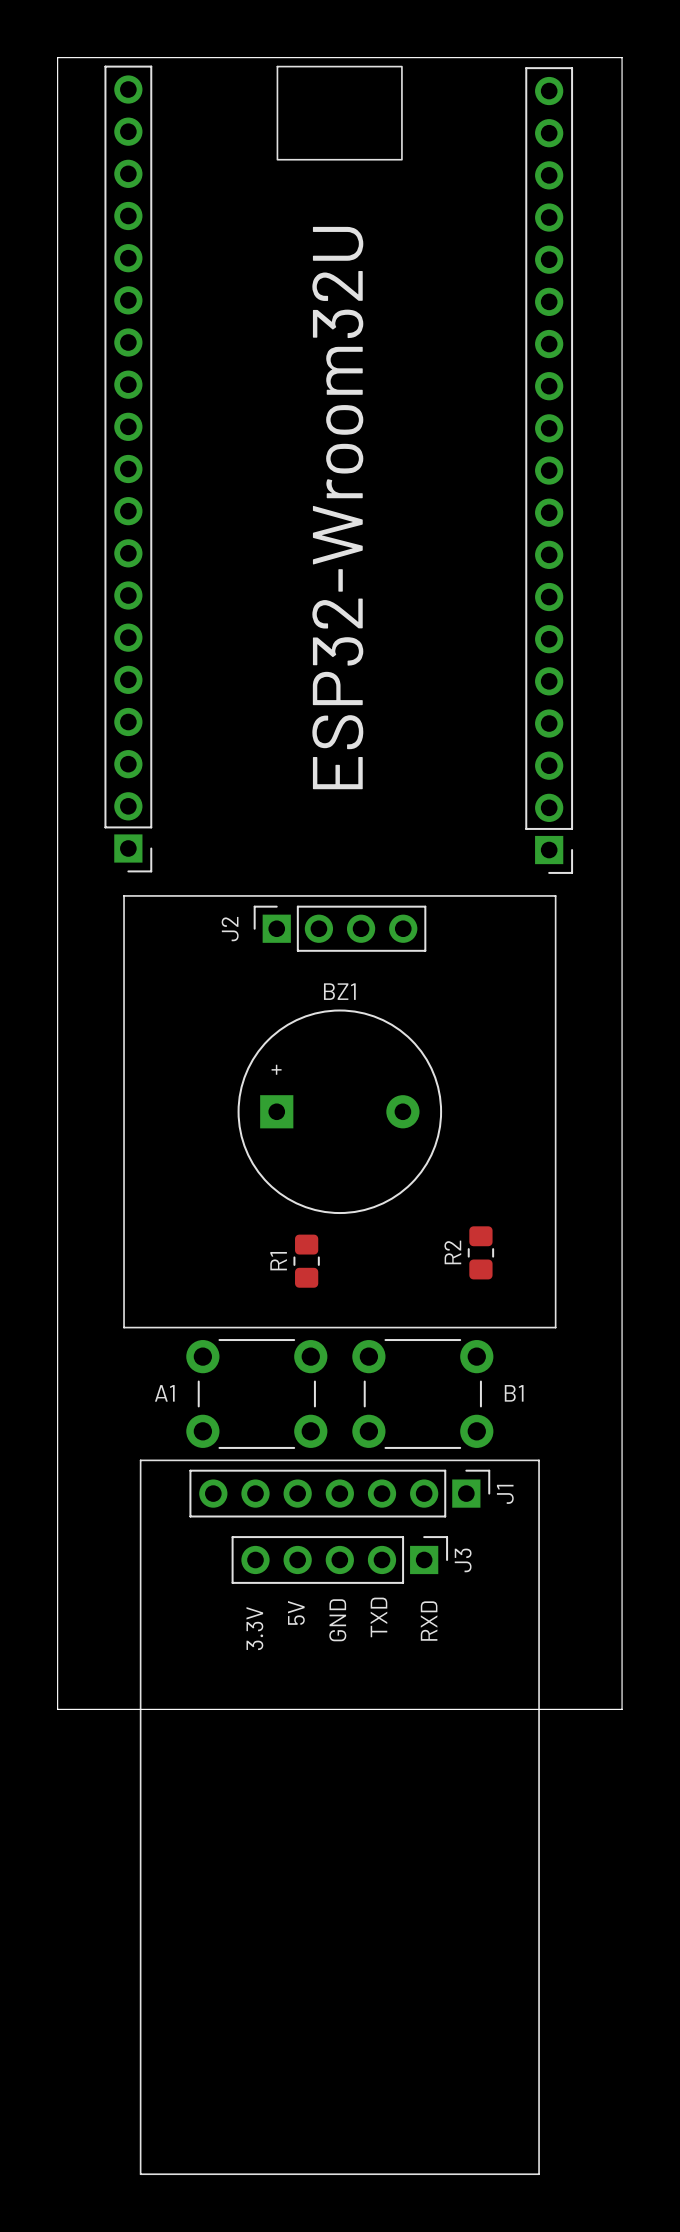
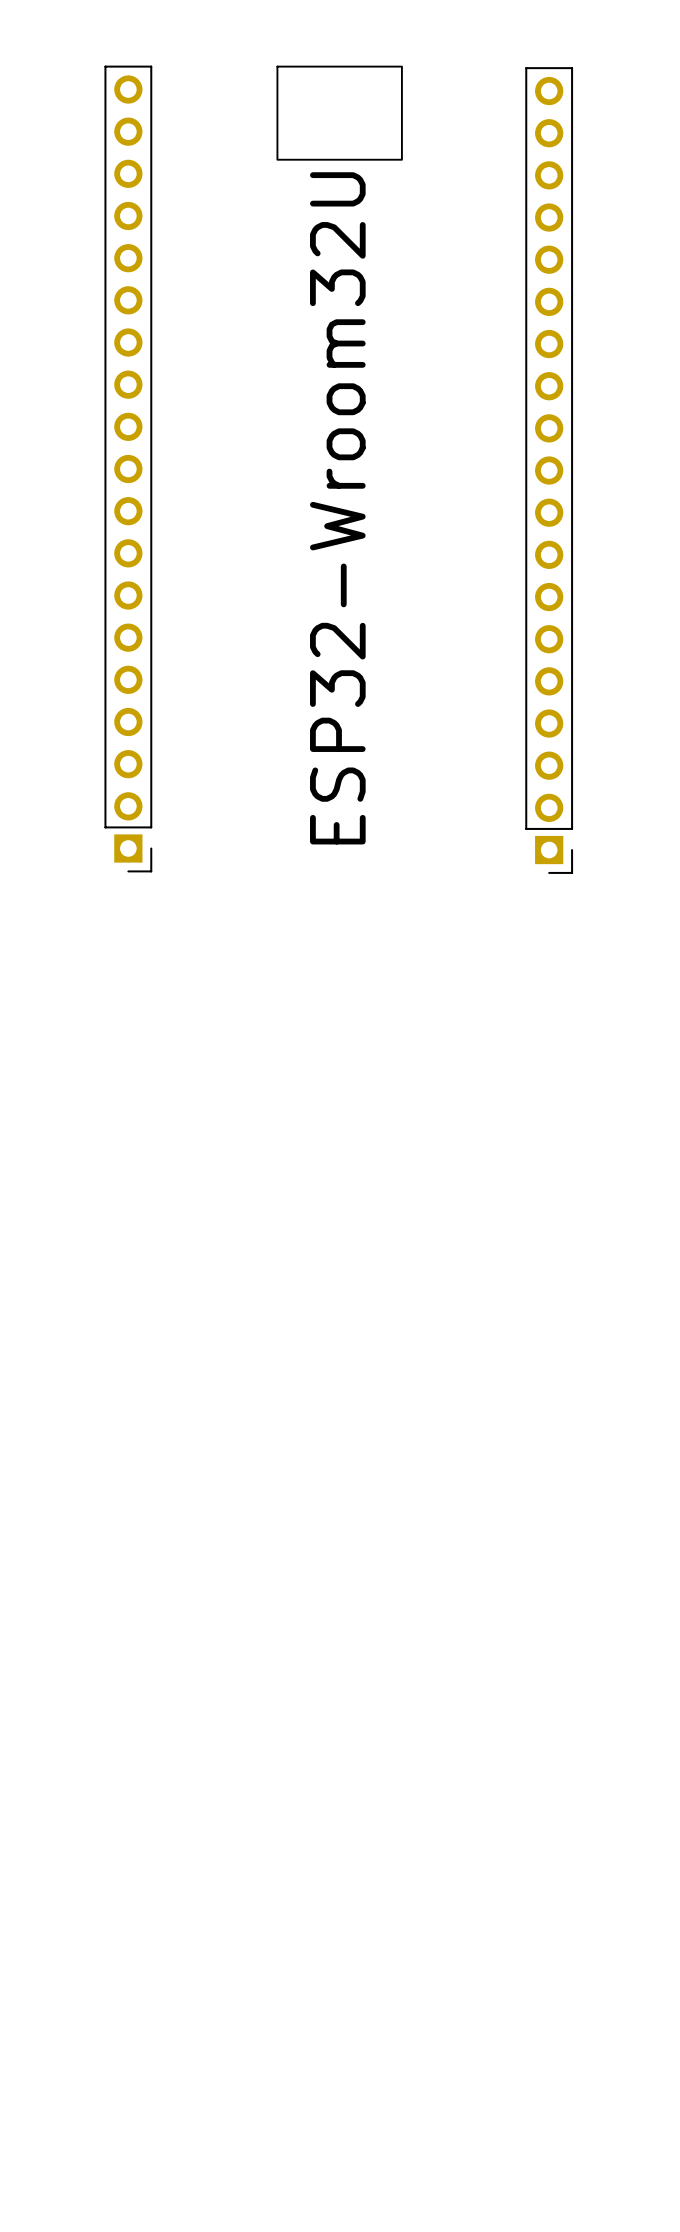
board edge: (57, 57) (622, 57) (622, 1709) (57, 1709) (57, 57) -> none
line: (124, 895) (555, 895) (555, 1327) (124, 1327) (124, 895) -> none
J2: (340, 928) -> none
BZ1: (339, 1111) -> none
R2: (480, 1252) -> none
R1: (306, 1261) -> none
A1: (256, 1393) -> none
B1: (422, 1393) -> none
line: (140, 1460) (539, 1460) (539, 2174) (140, 2174) (140, 1460) -> none
J1: (339, 1493) -> none
J3: (339, 1559) -> none
text: 5V (296, 1612) -> none
text: TXD (378, 1617) -> none
text: GND (337, 1620) -> none
text: RXD (429, 1621) -> none
text: 3.3V (254, 1628) -> none

